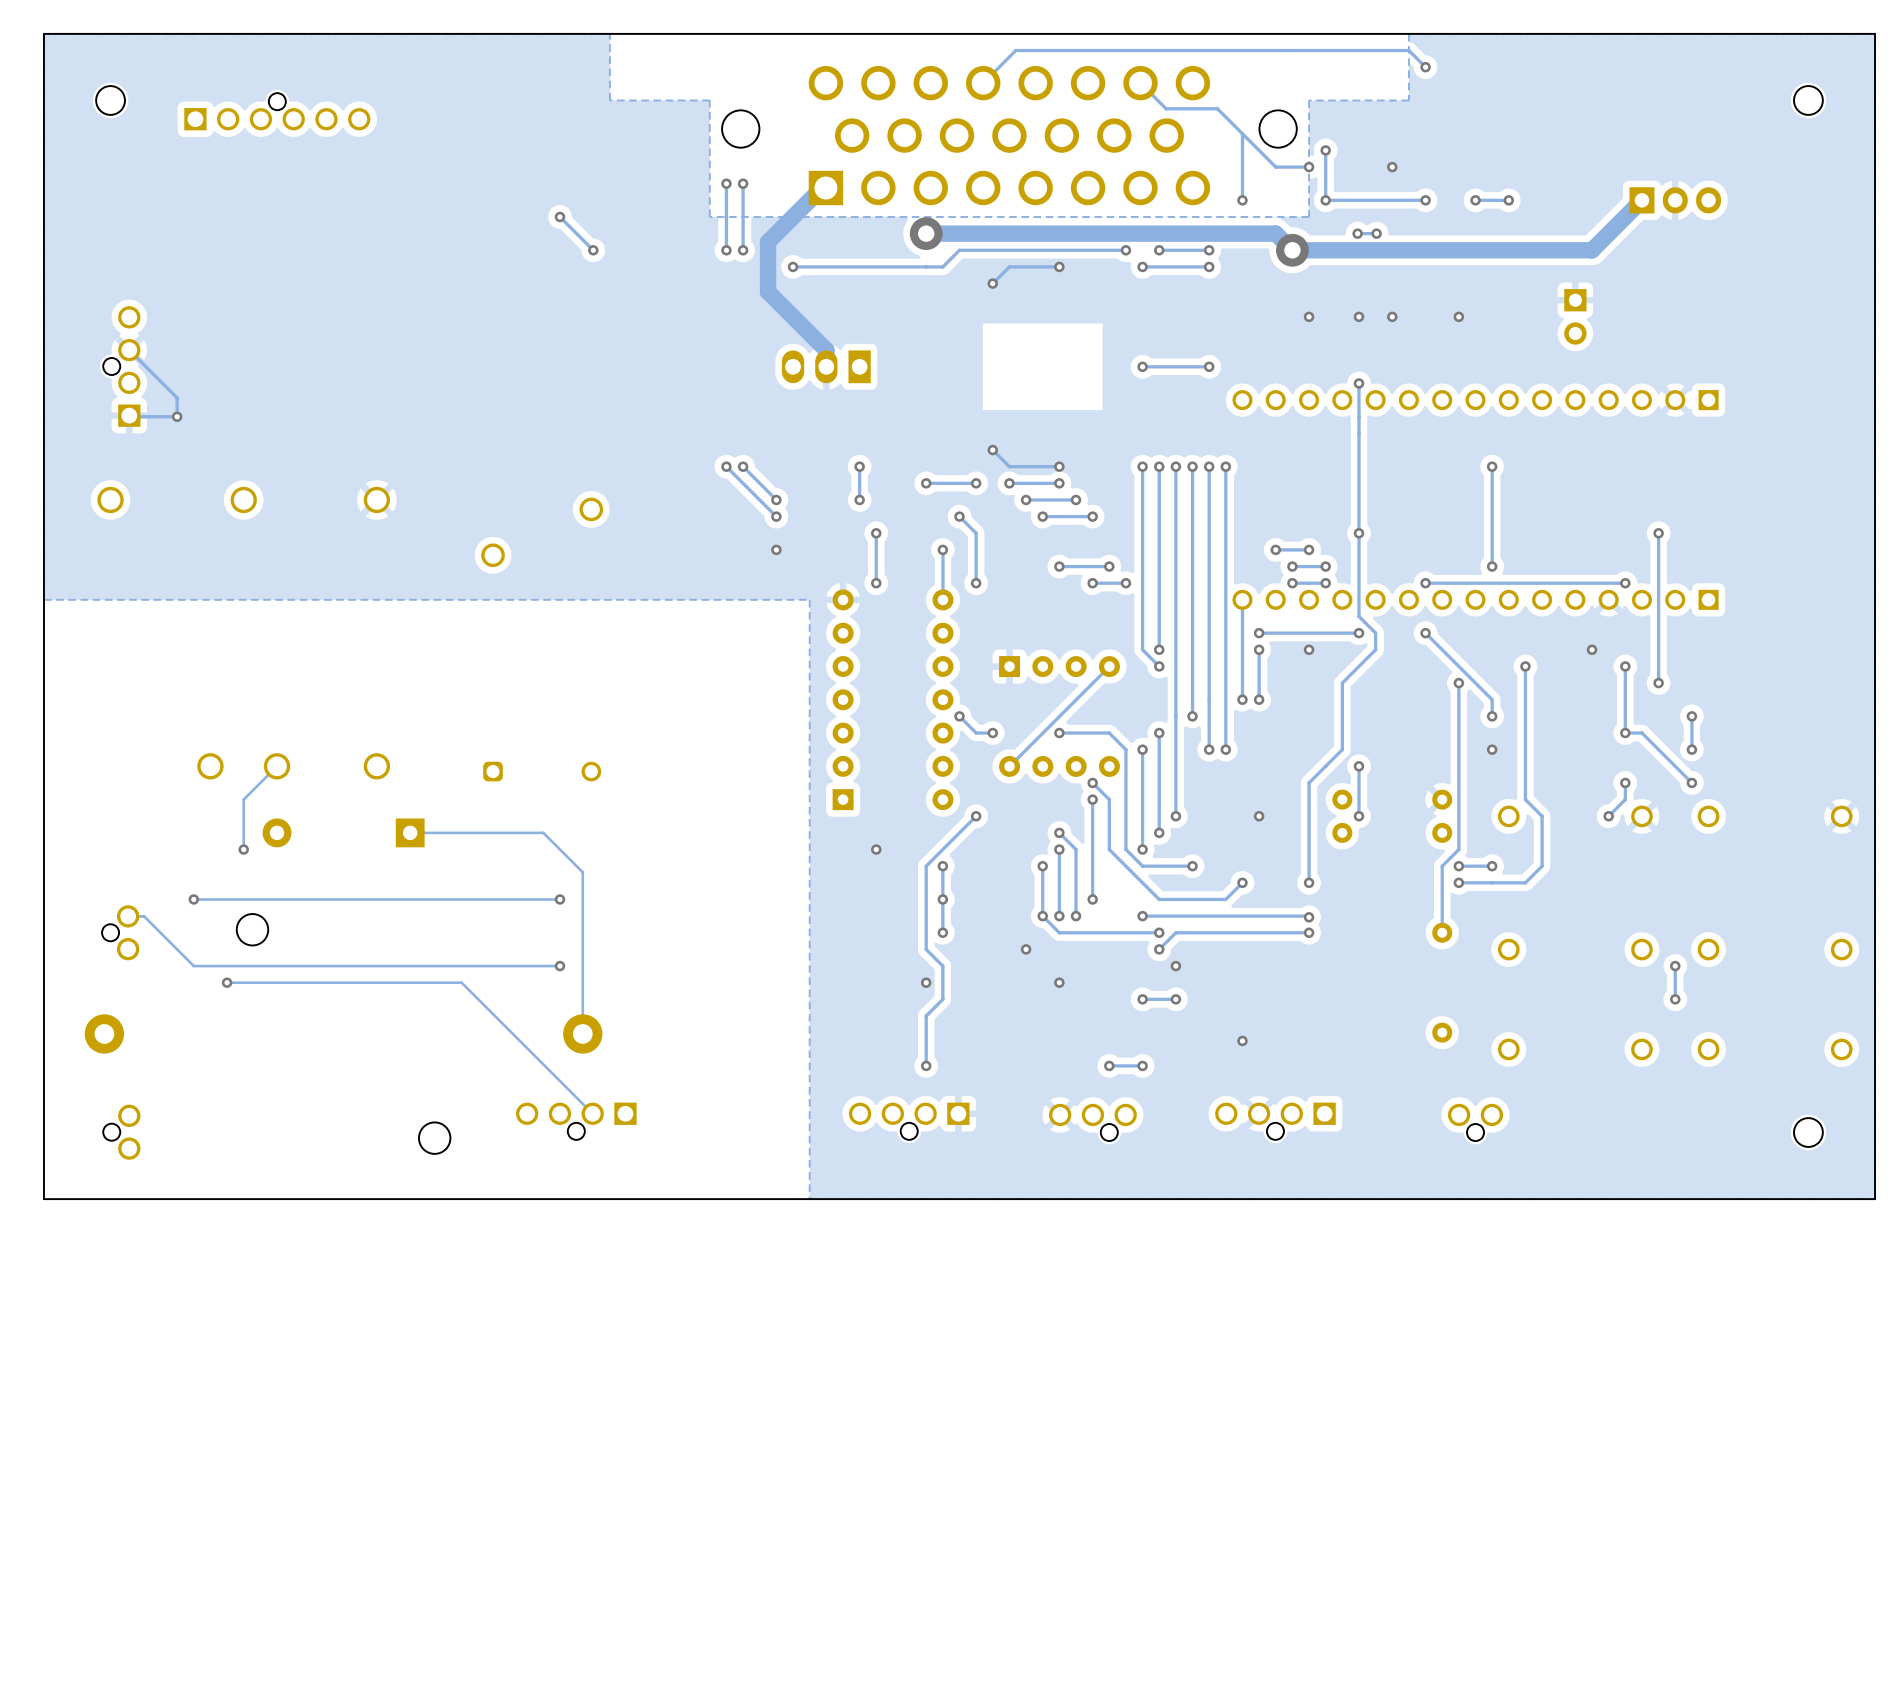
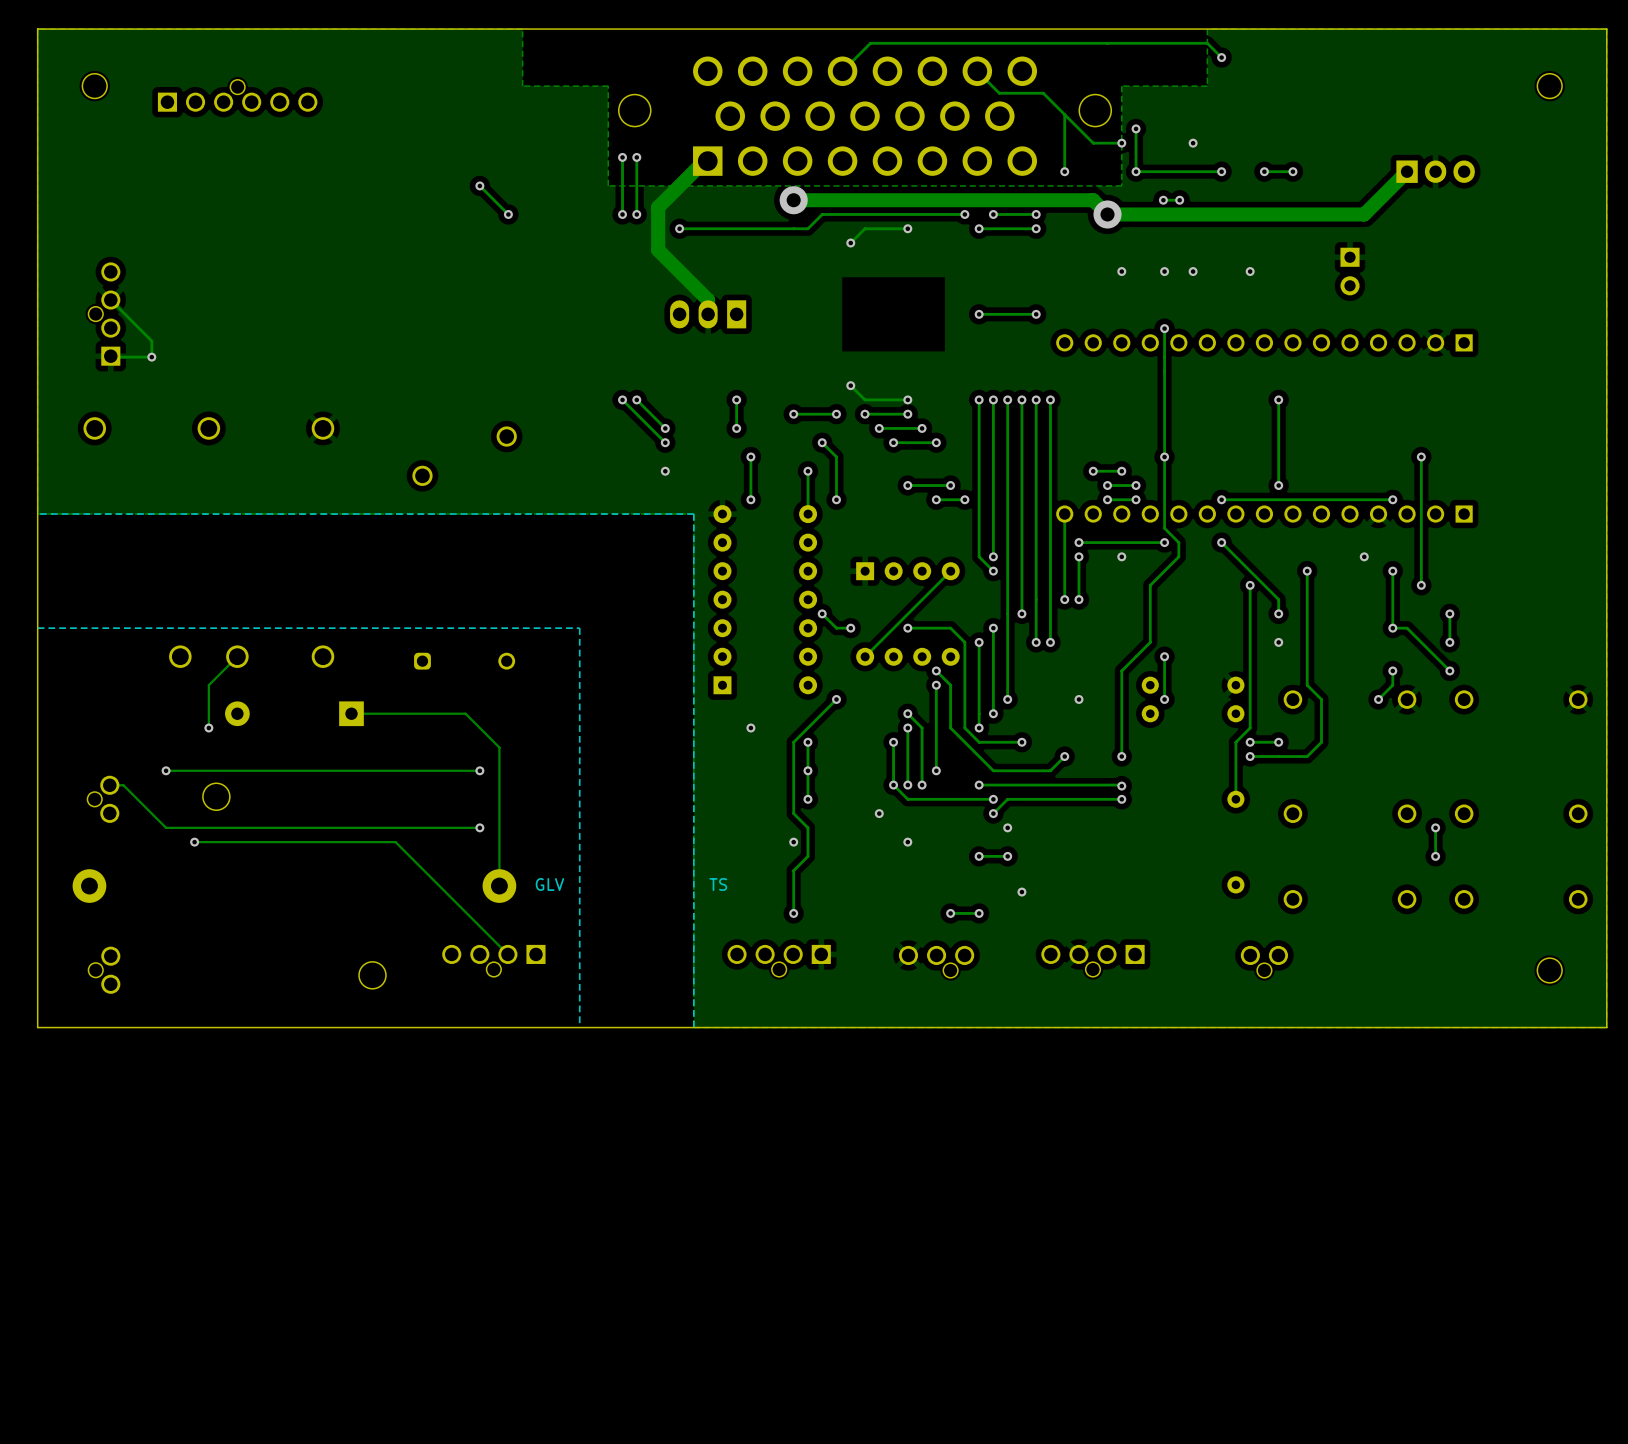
line: none -> (37, 514) (693, 514) (693, 1027)
line: none -> (37, 628) (579, 628) (579, 1027)
text: none -> GLV (549, 884)
text: none -> TS (718, 884)
via position: (1242, 1040) -> (1021, 892)

